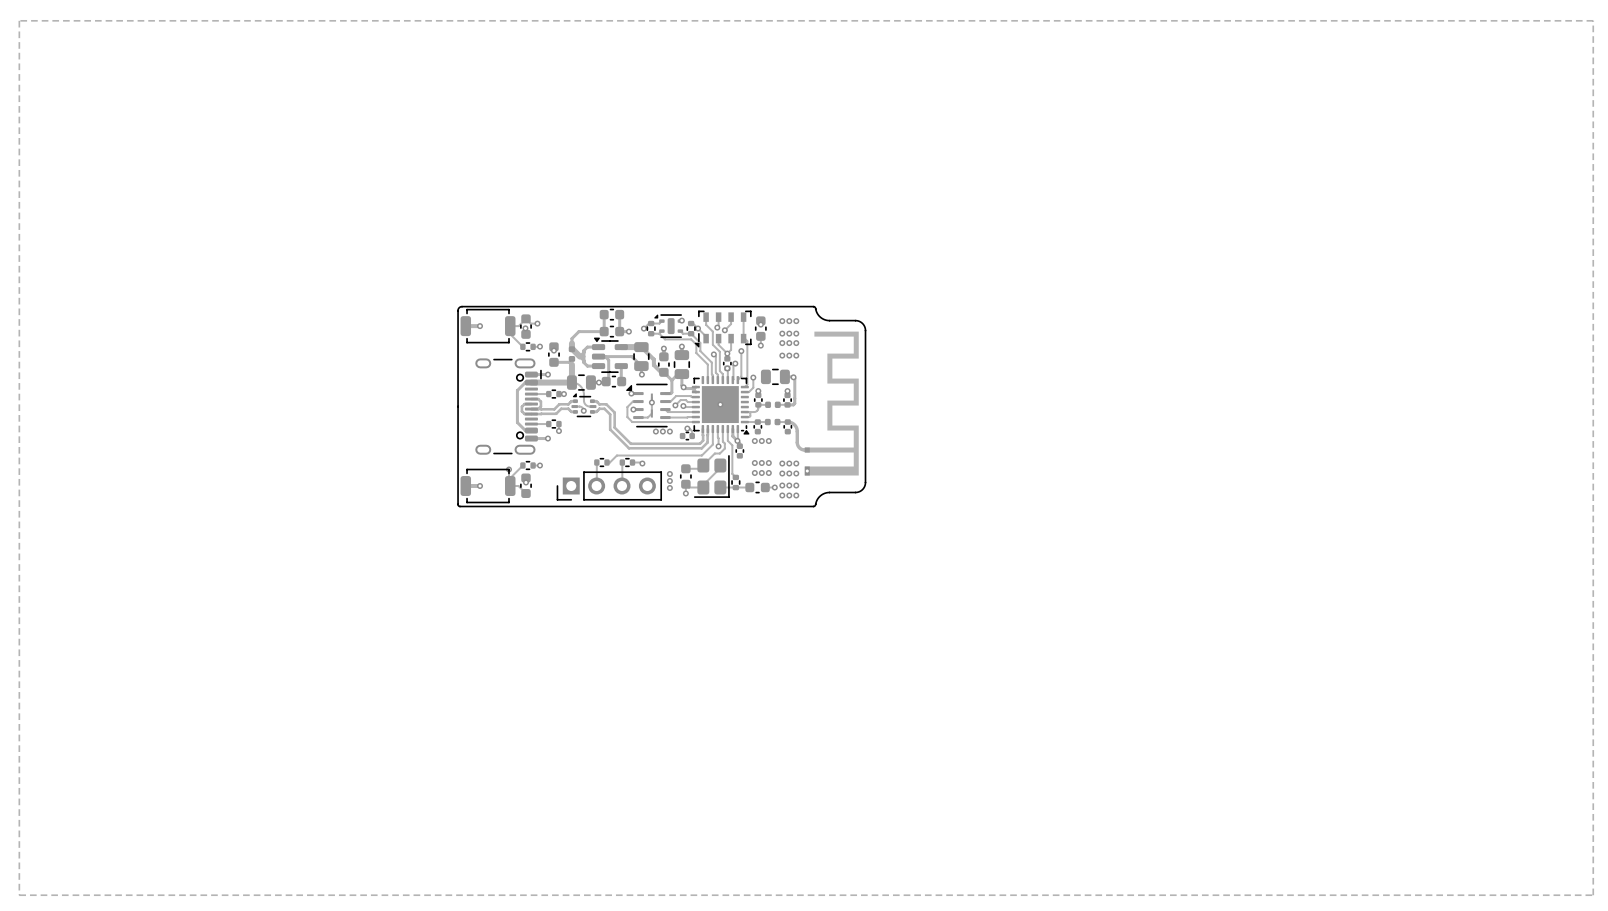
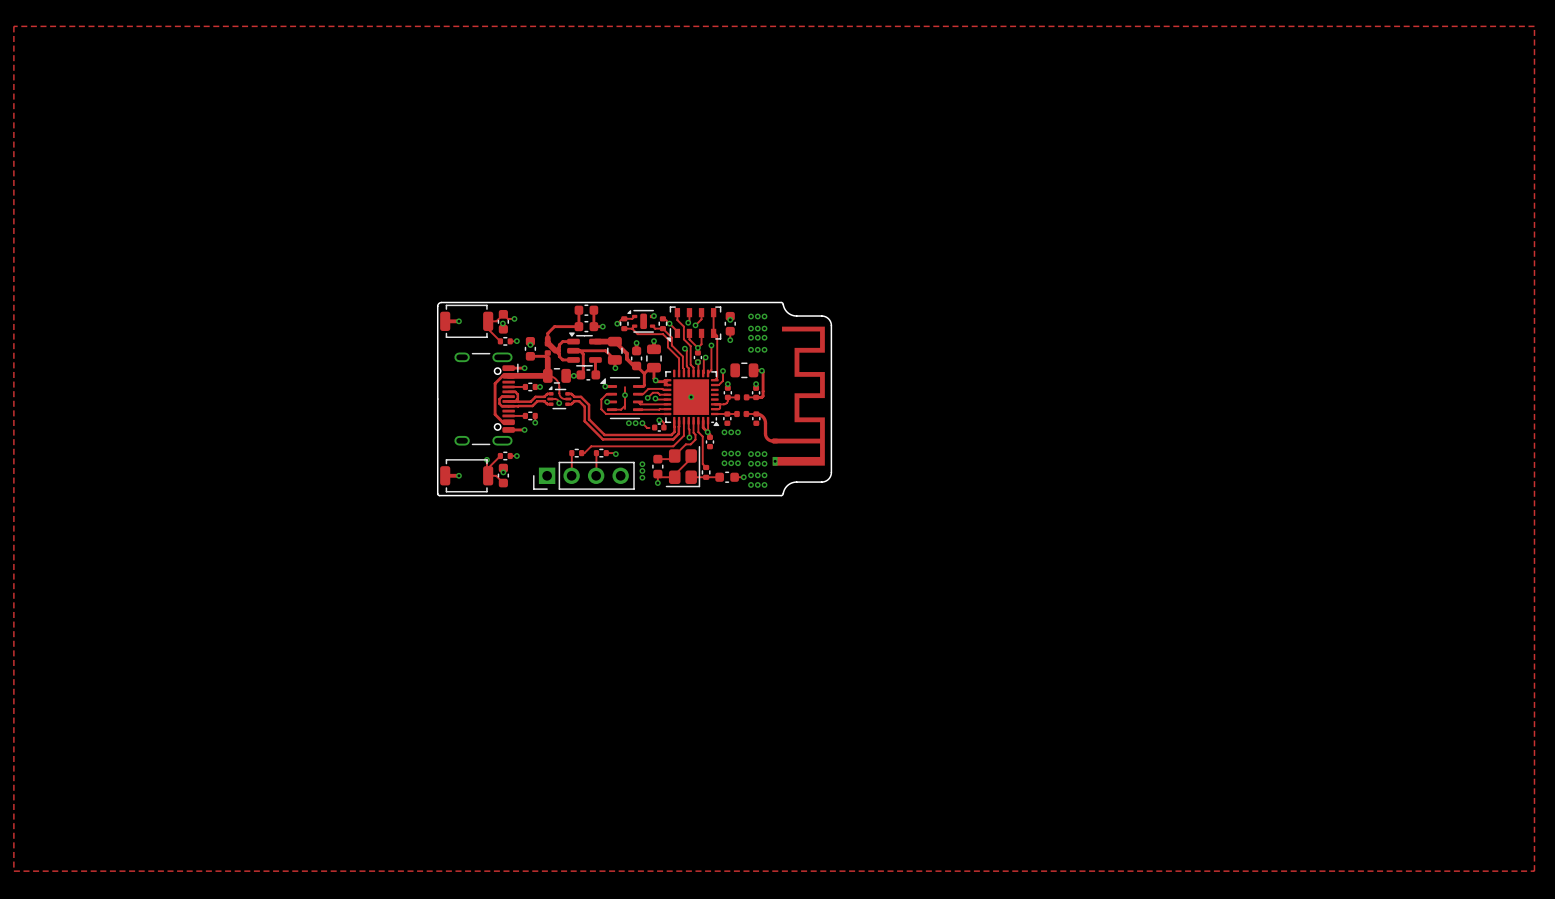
track: none -> (642, 423) (649, 428)

